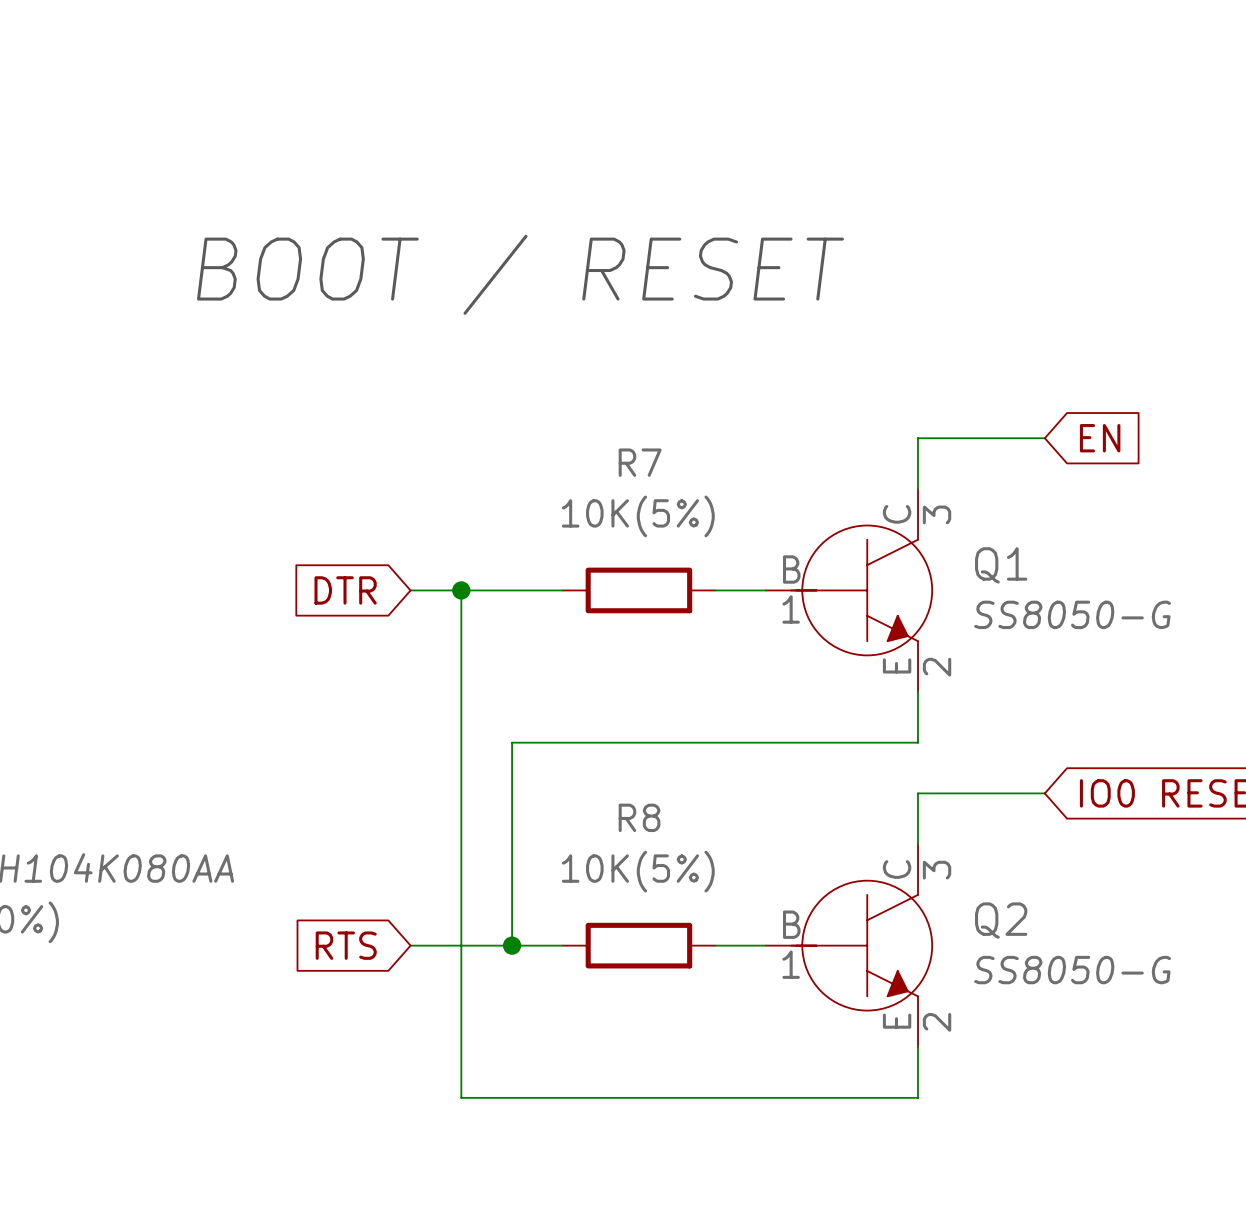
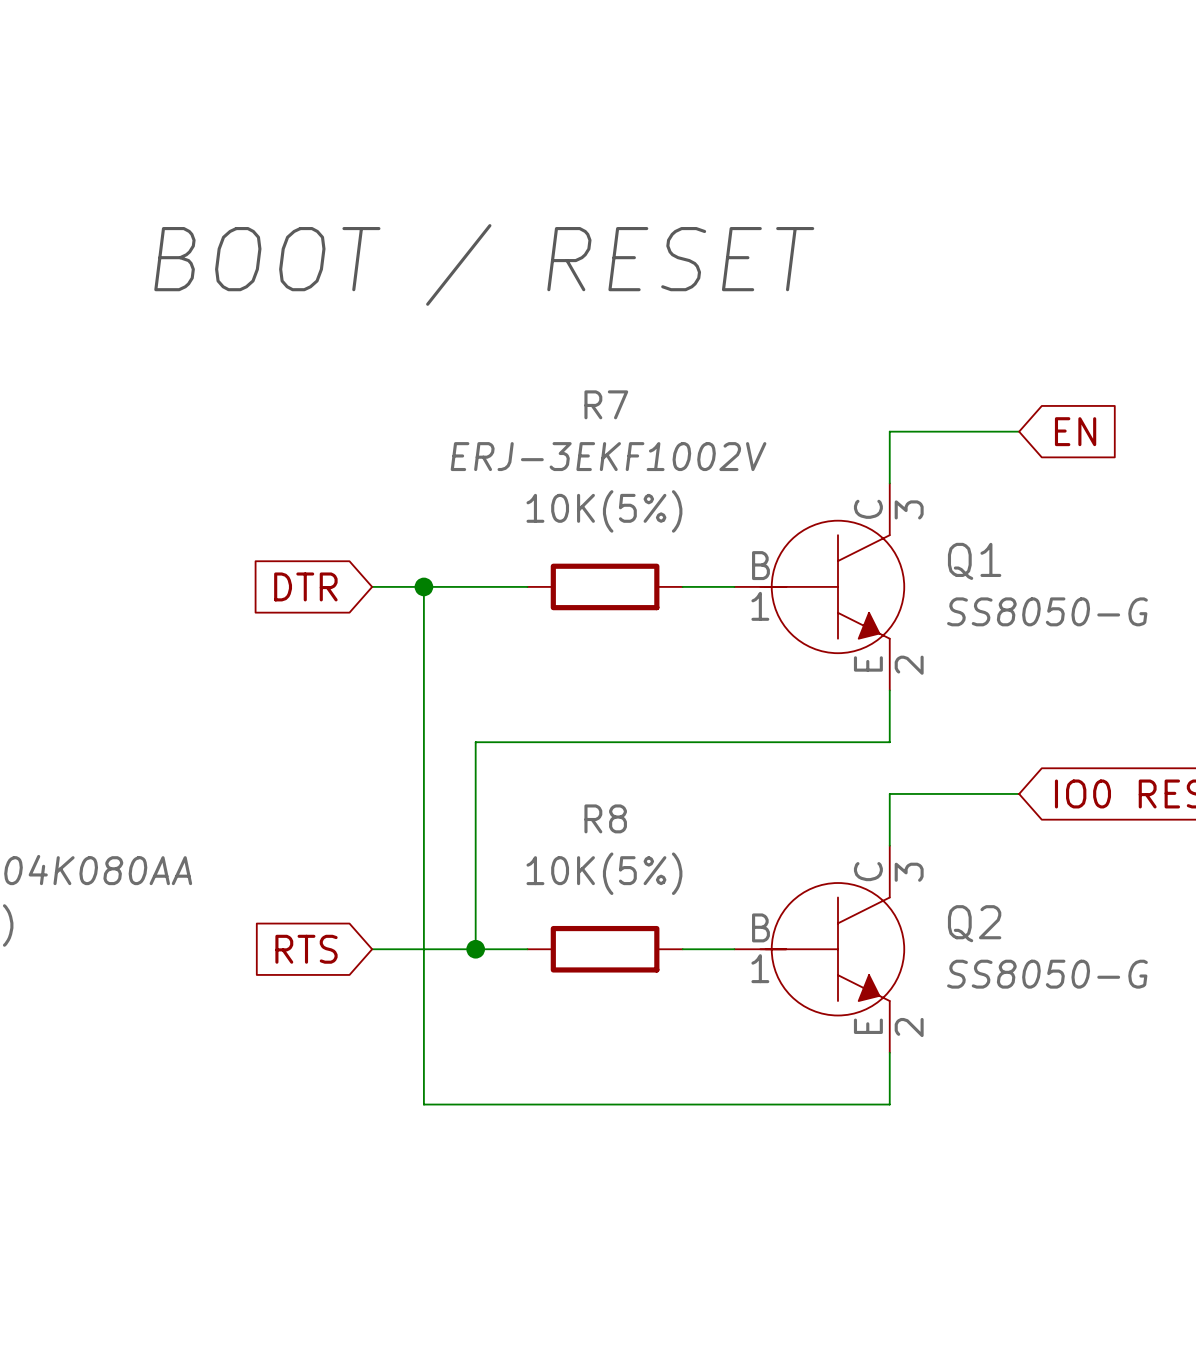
R7 name position: R7 (640, 462) -> R7 (606, 404)
R7 text: none -> ERJ-3EKF1002V (608, 456)

